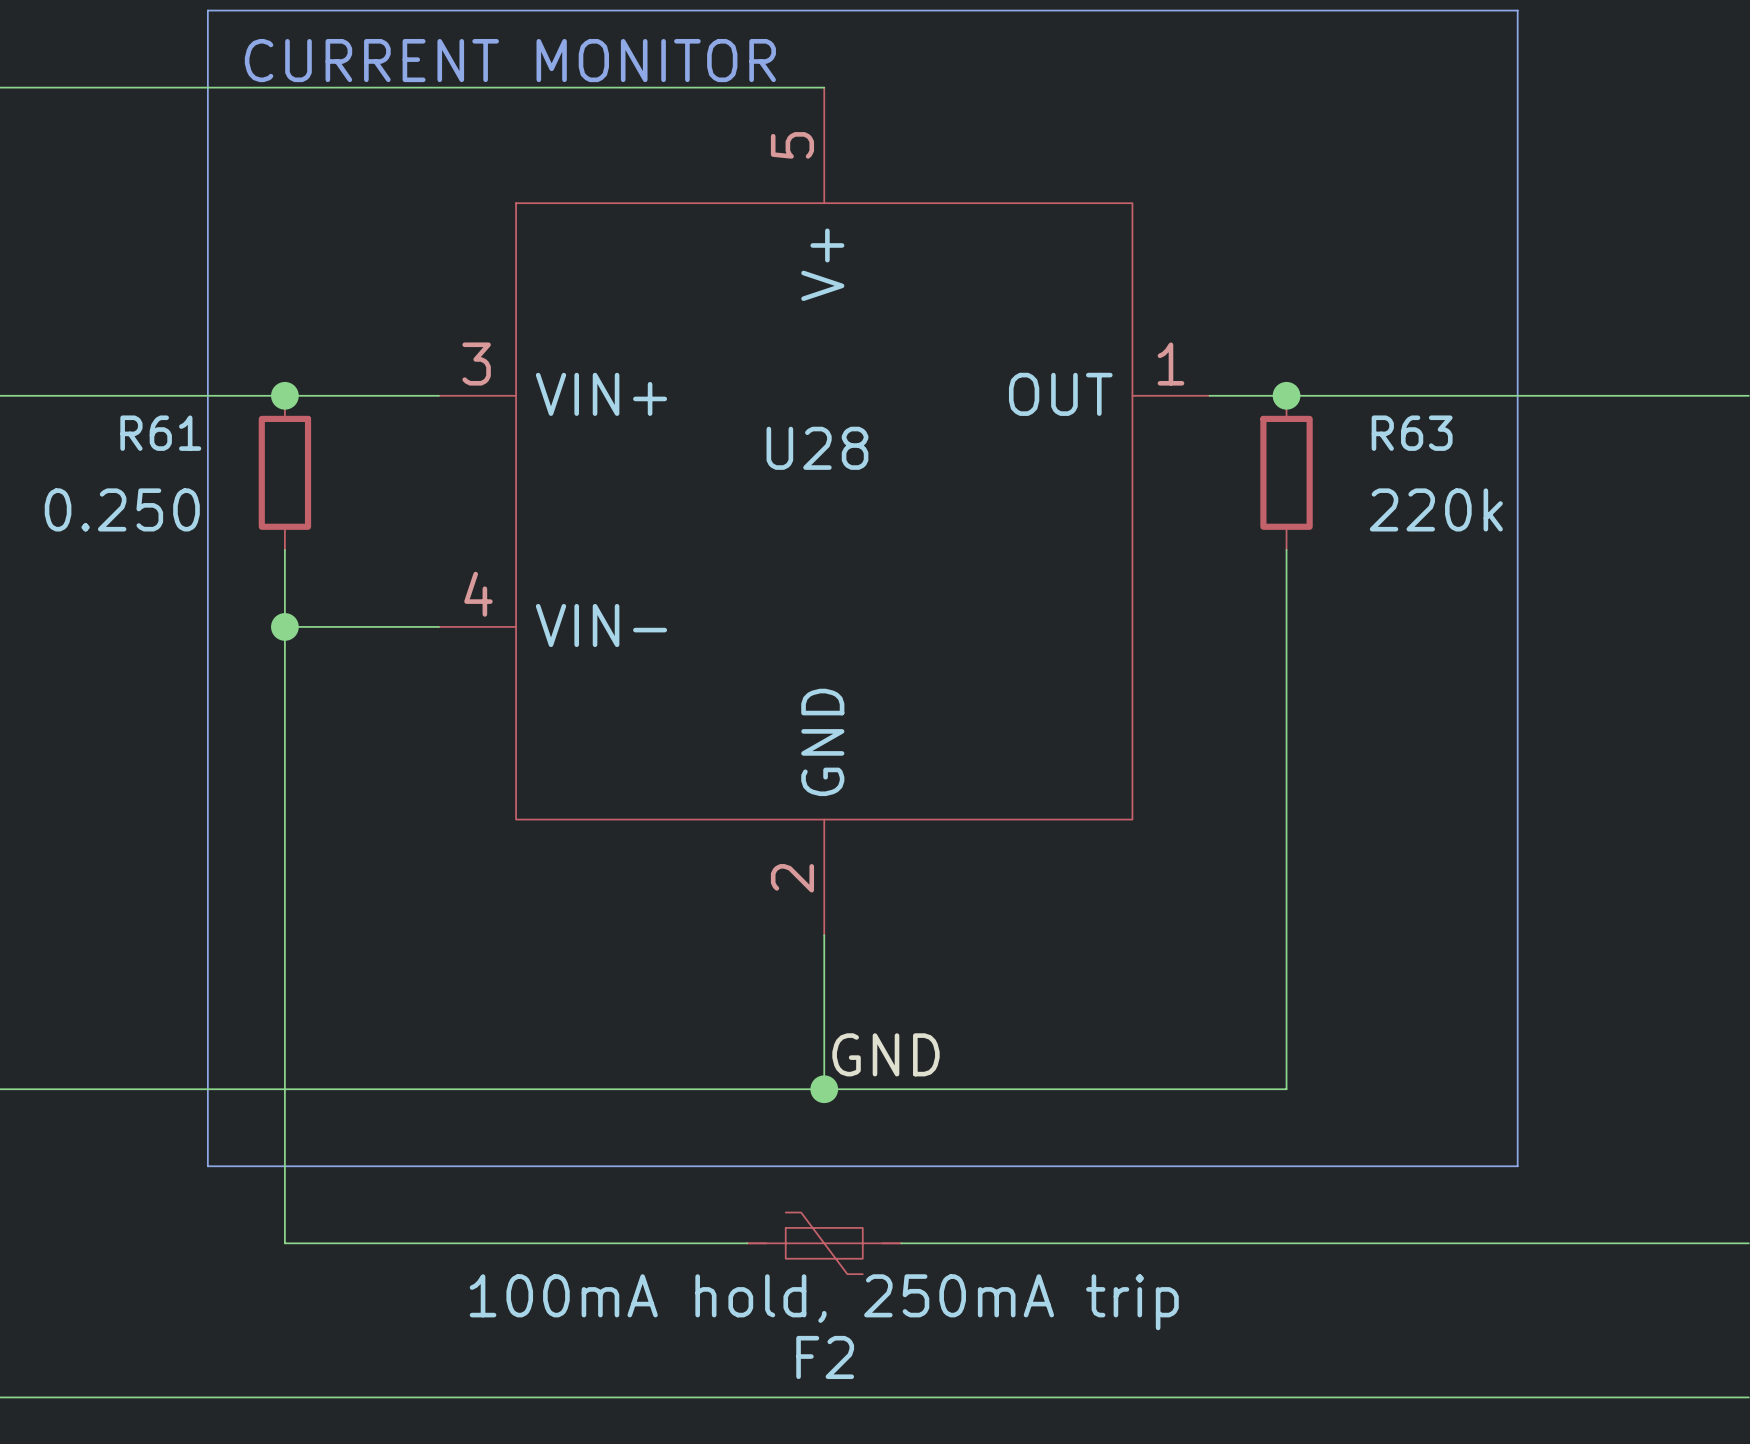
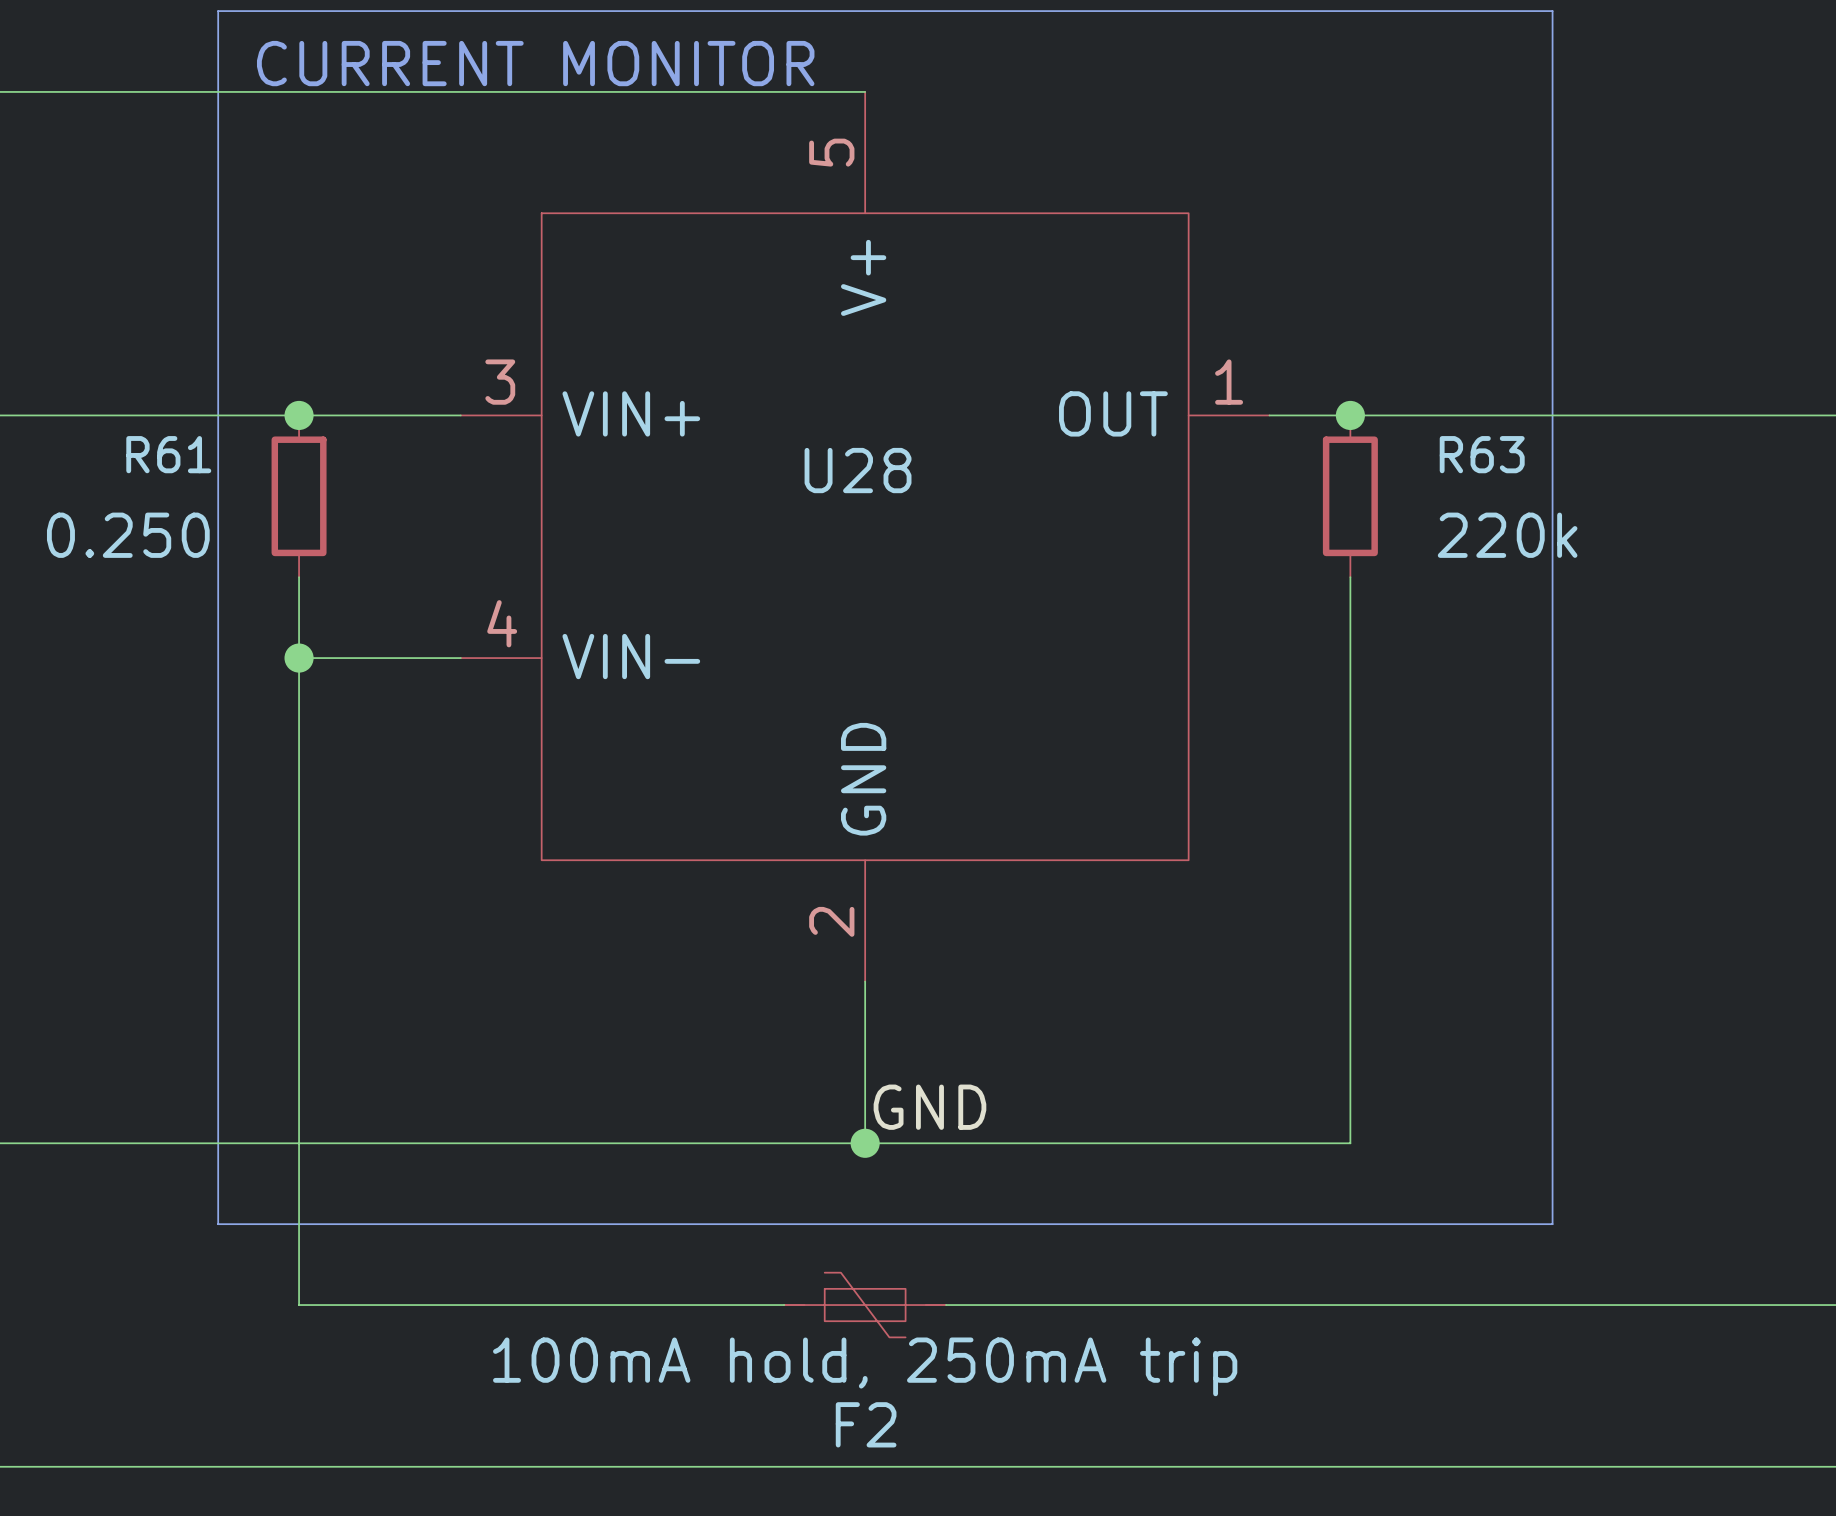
line: (1479, 10) (1517, 10) (1517, 1166) (1479, 1166) -> (1552, 11) (1552, 1224)

